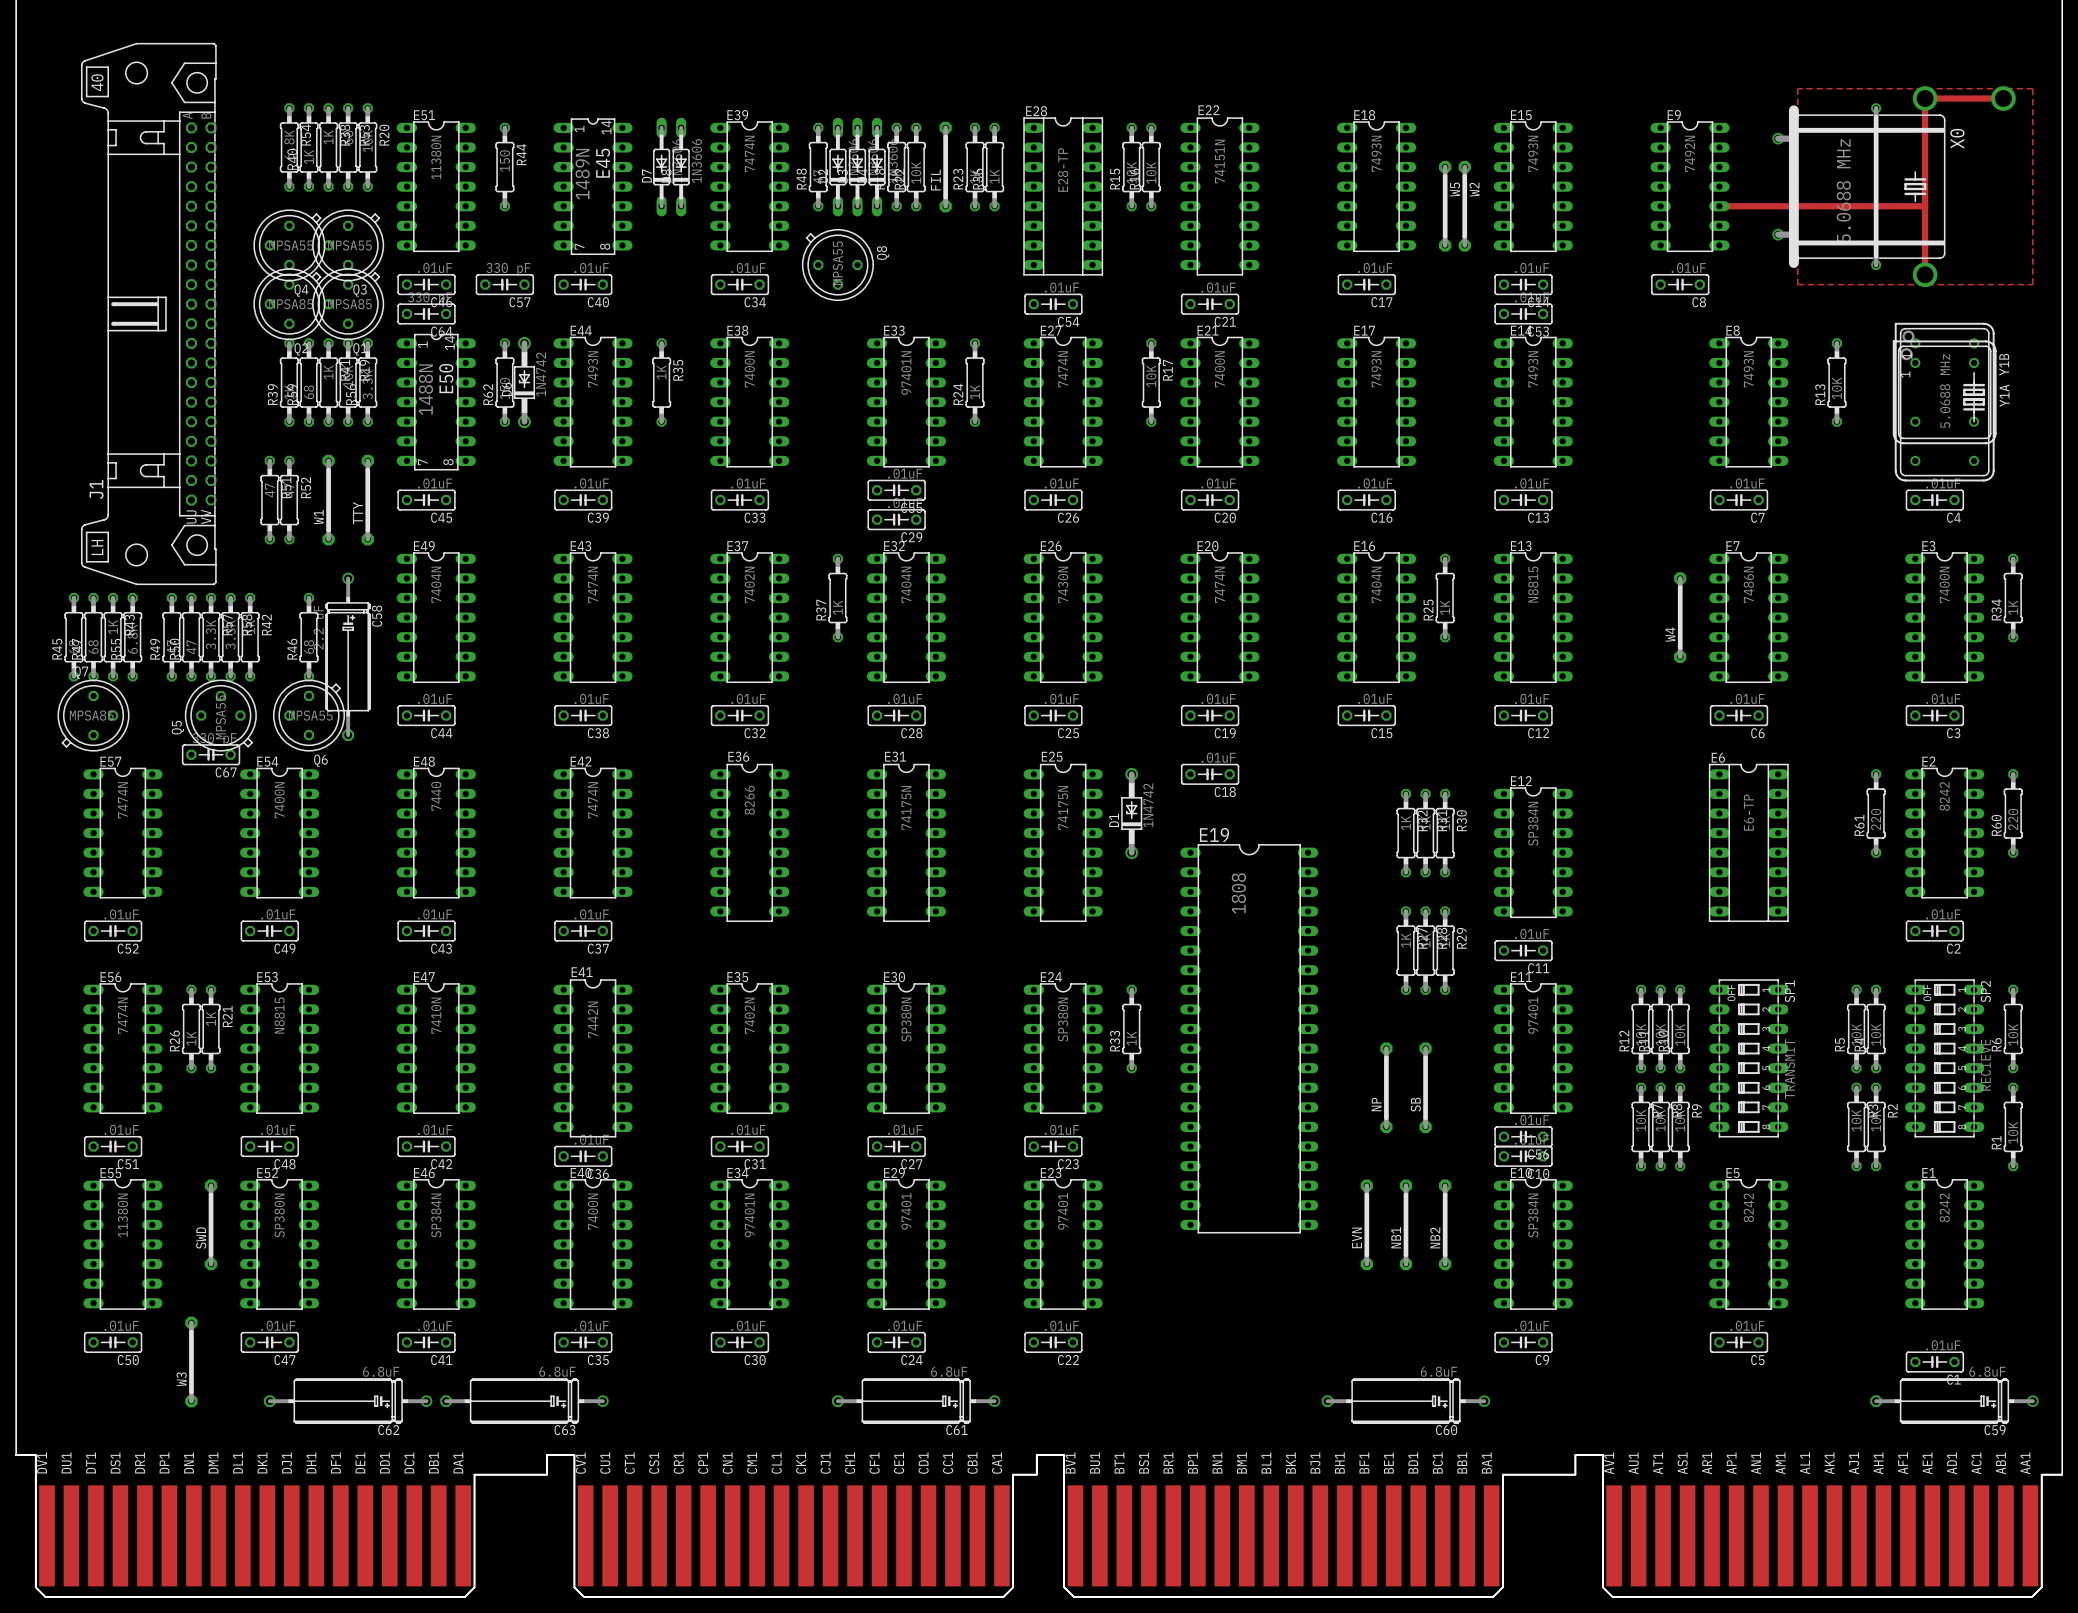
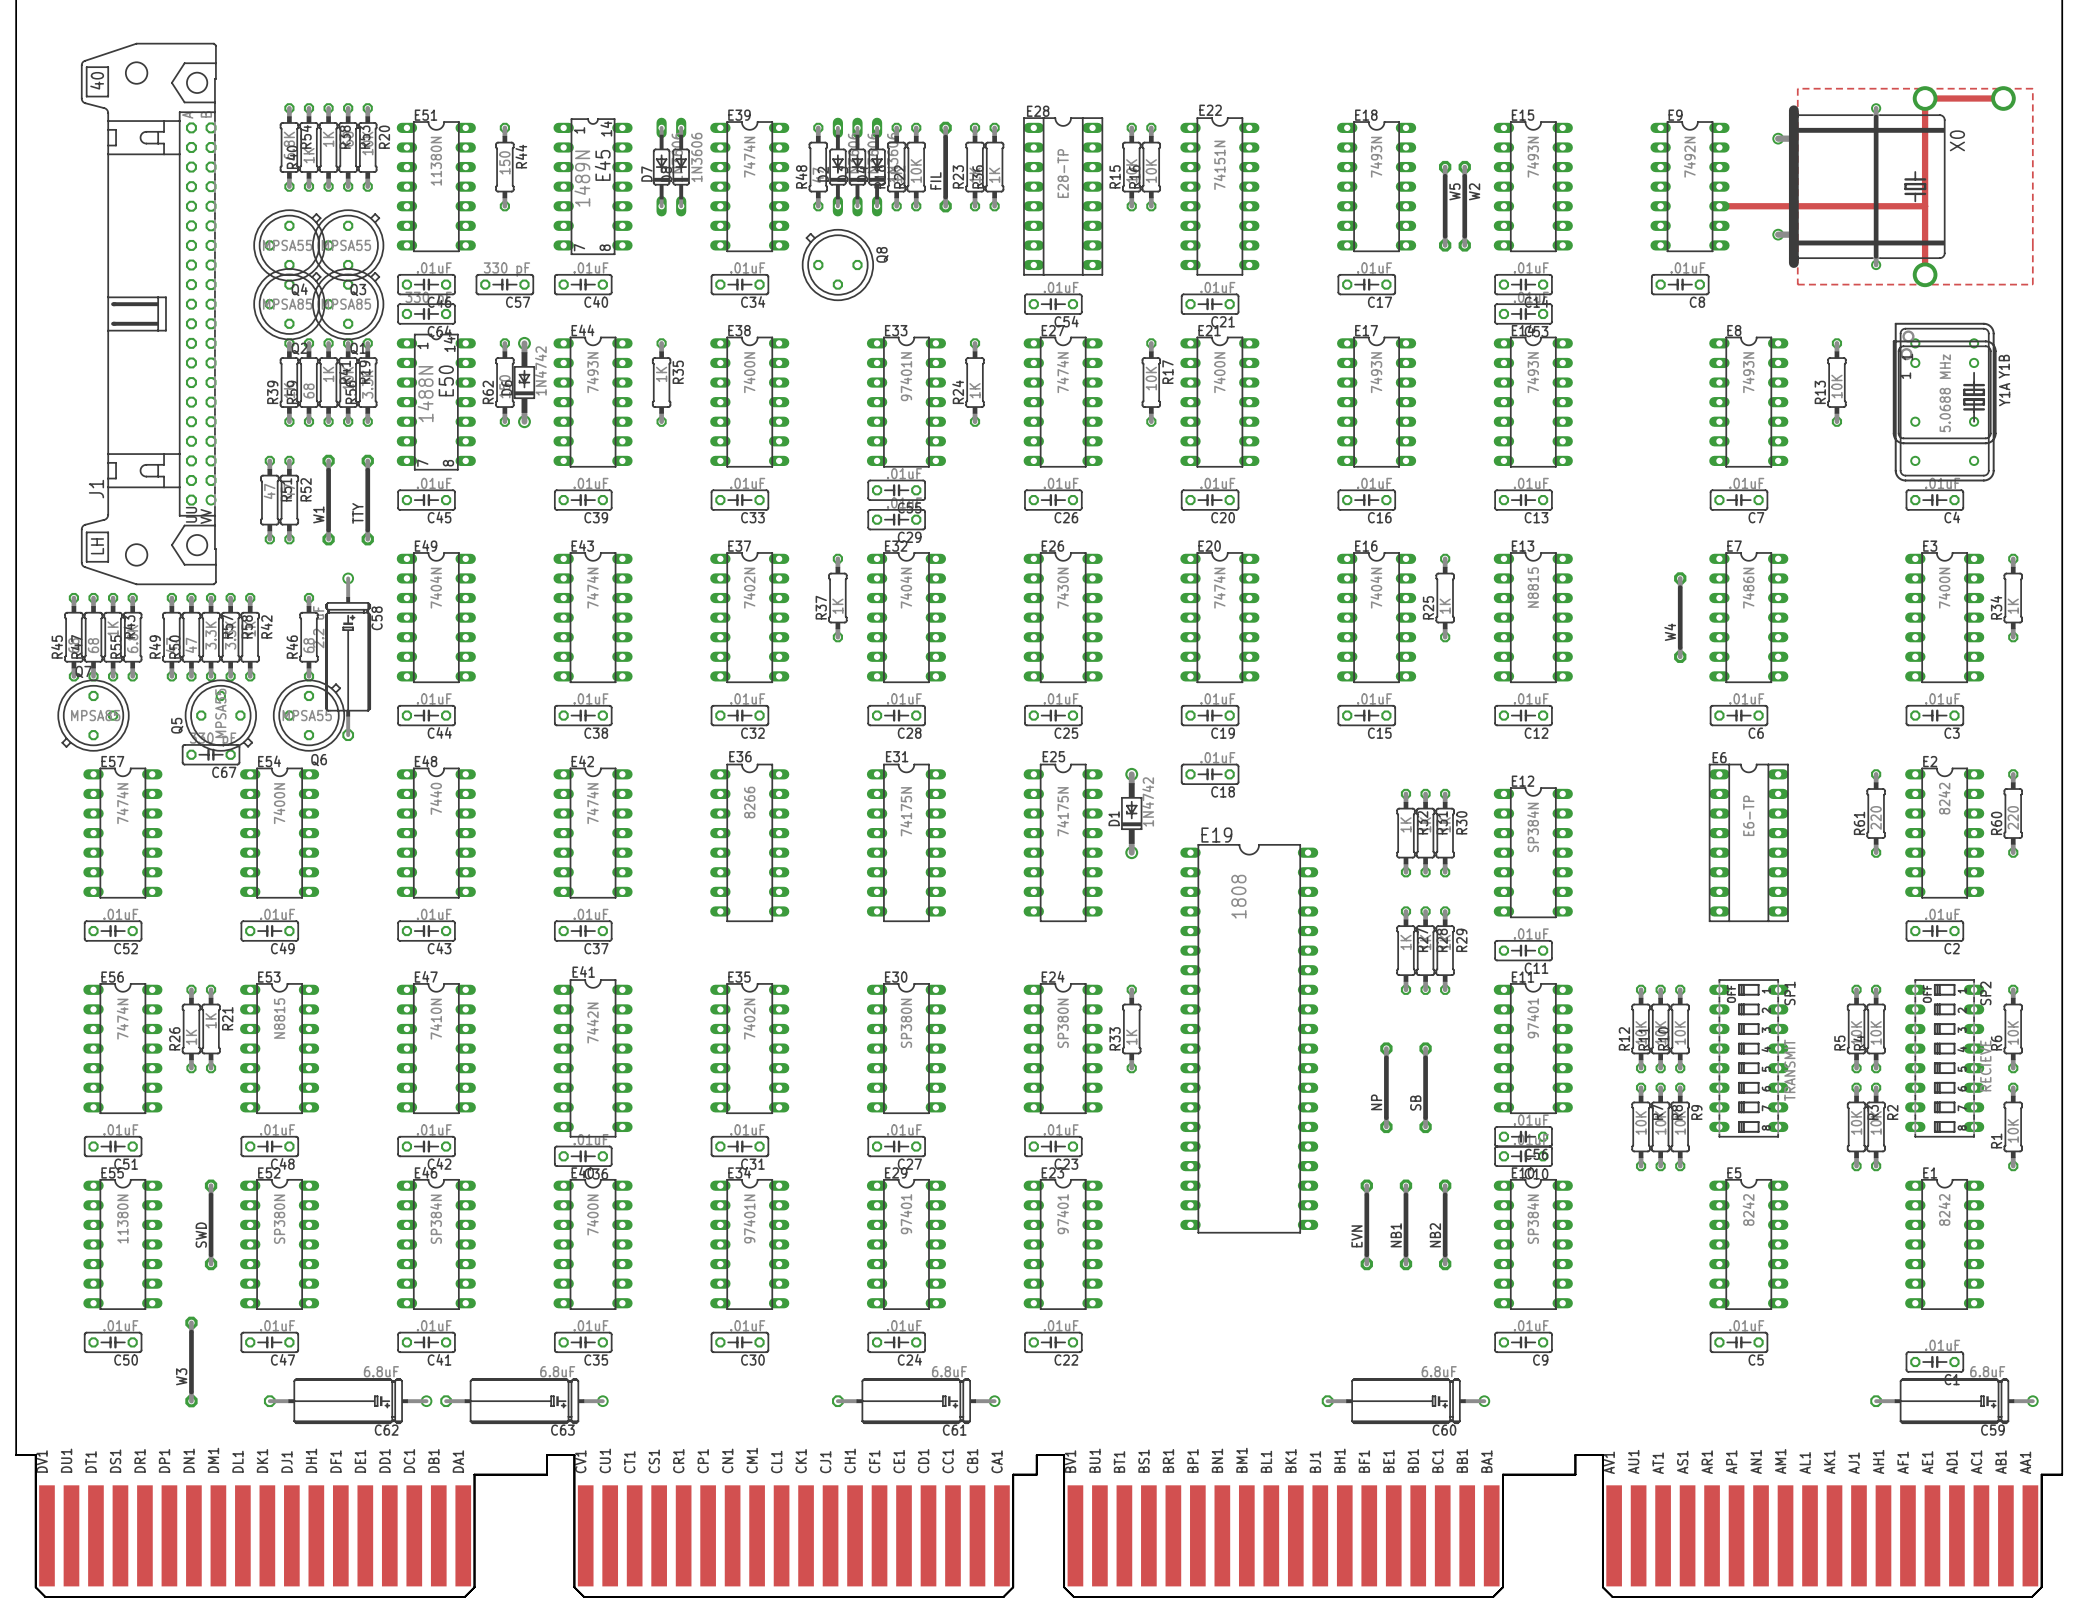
X0 value: 5.0688 MHz (1843, 190) -> none
Q8 value: MPSA55 (837, 263) -> none

